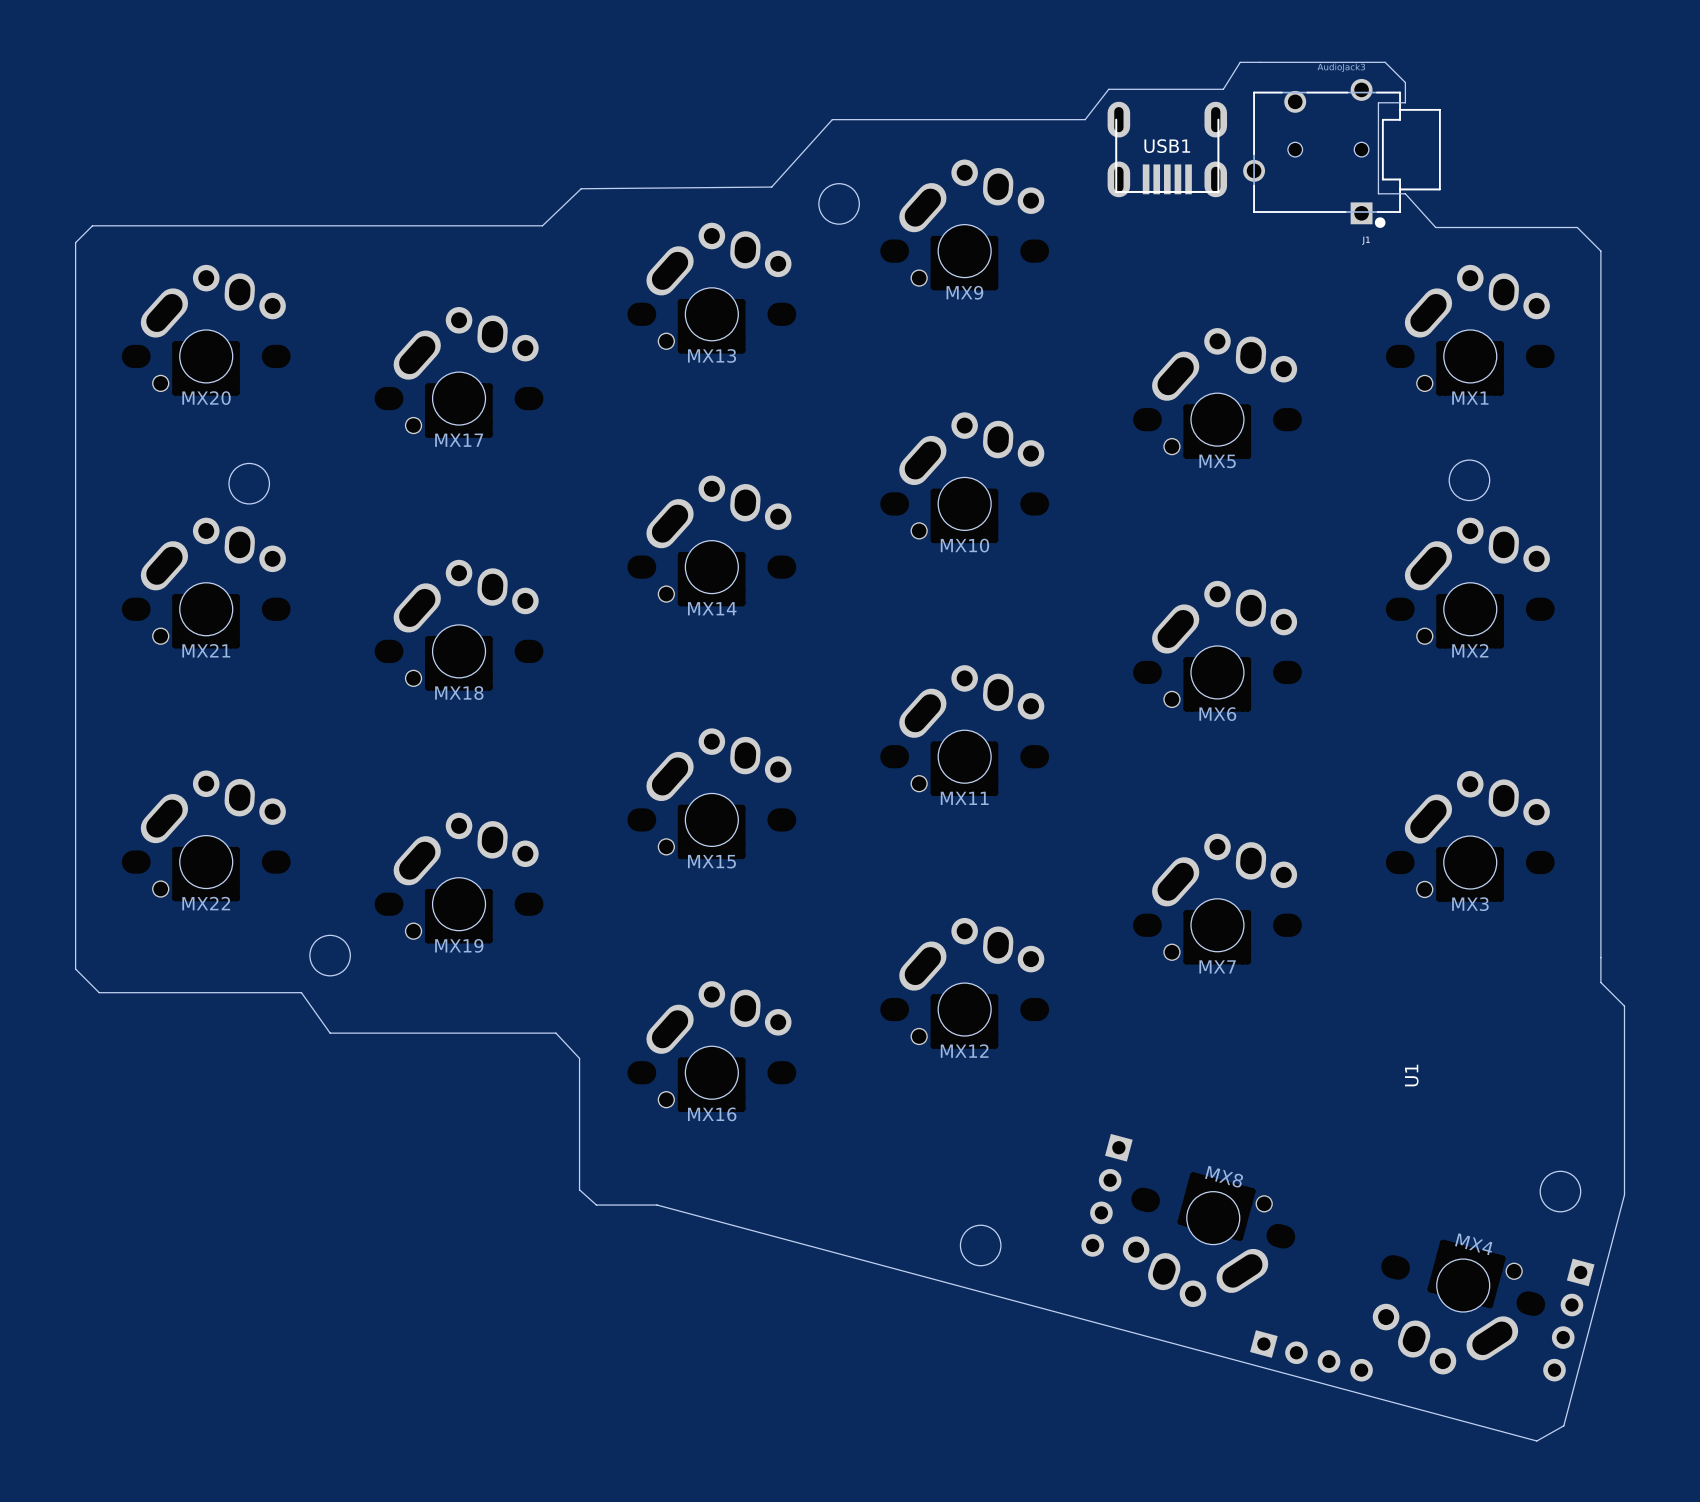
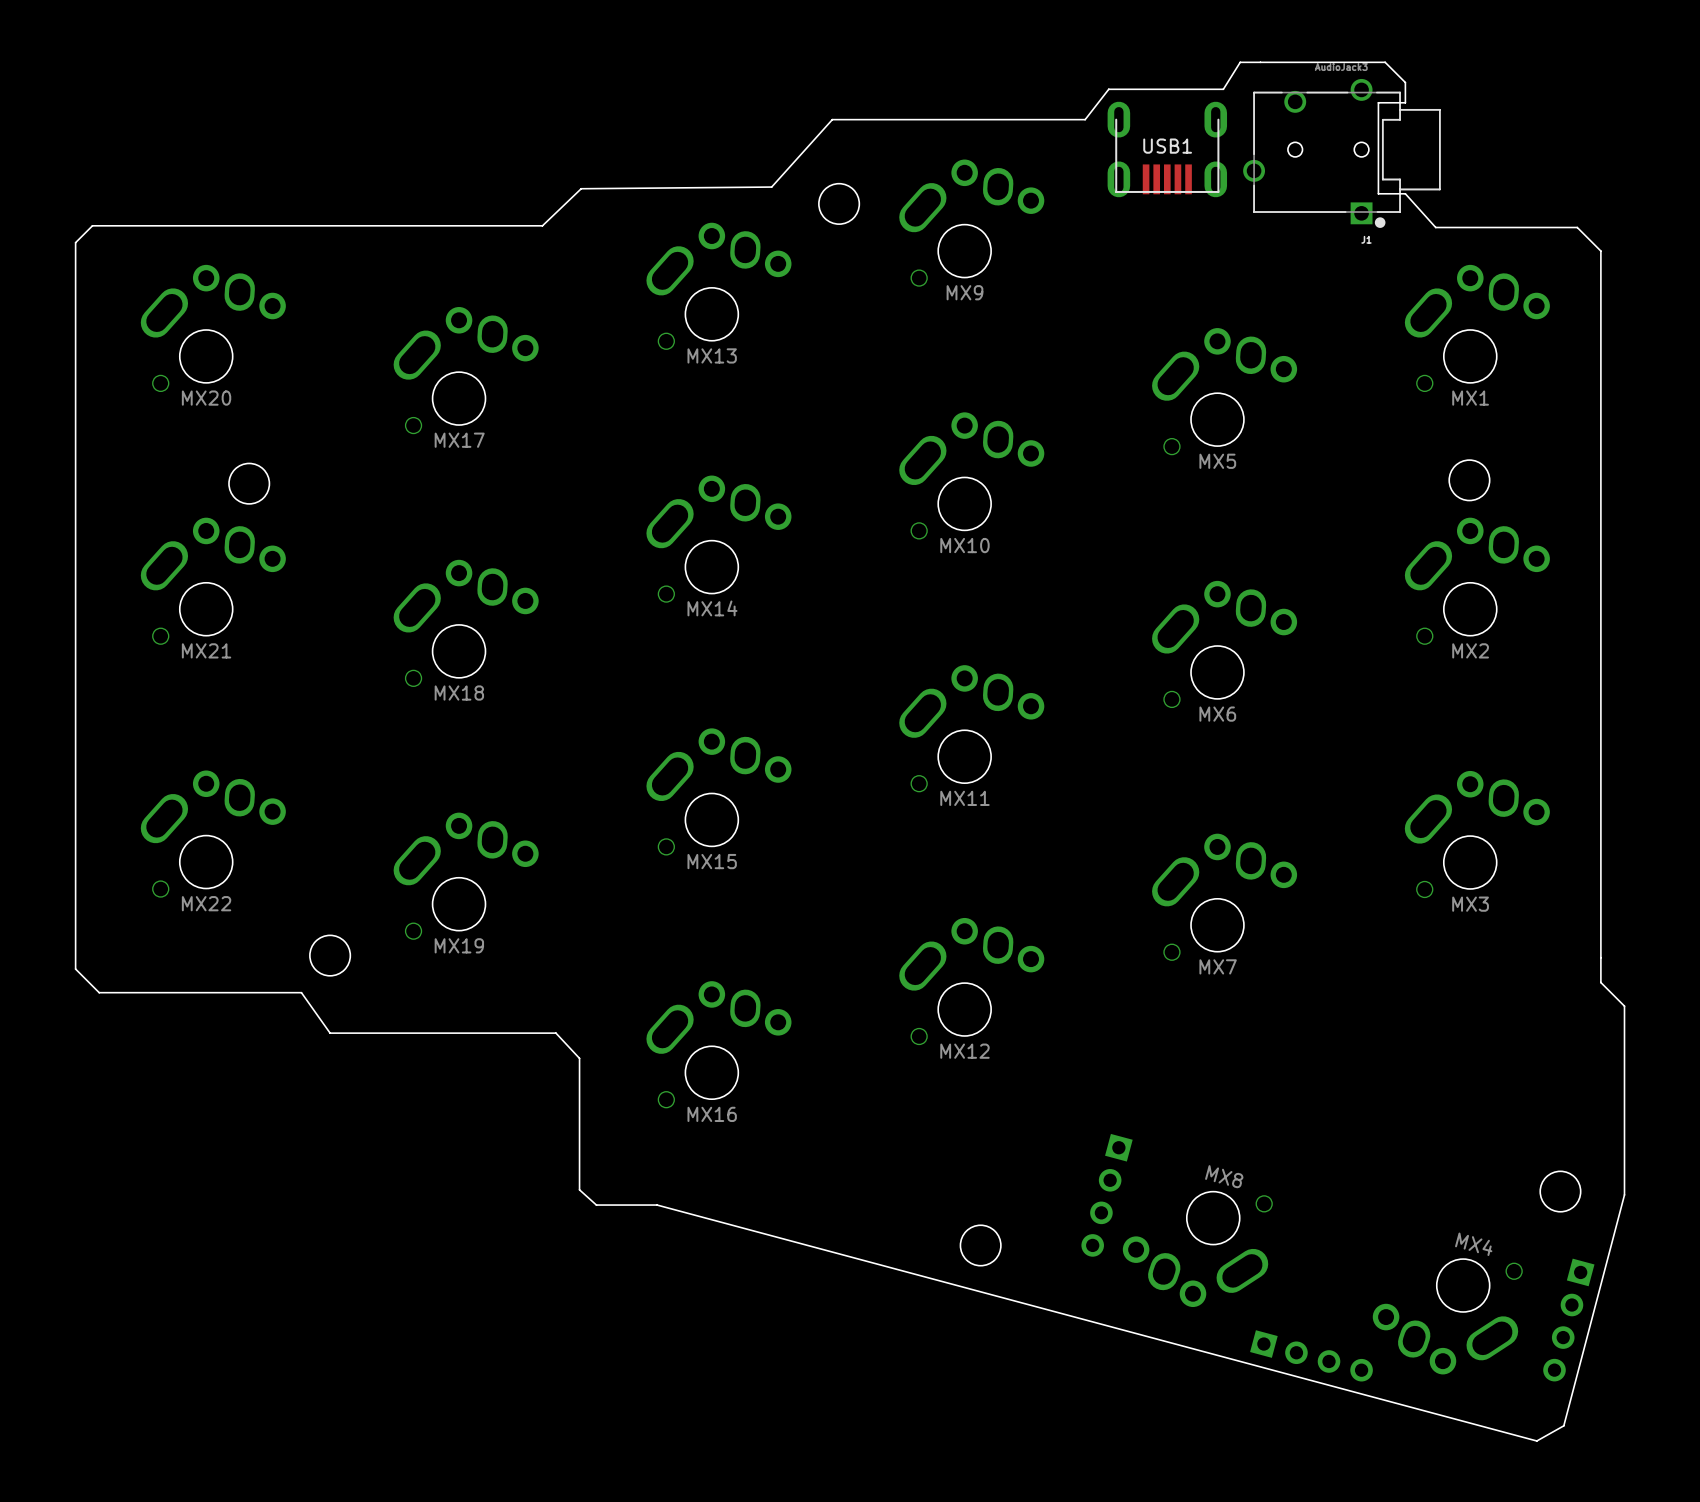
U1: (1411, 1075) -> none

